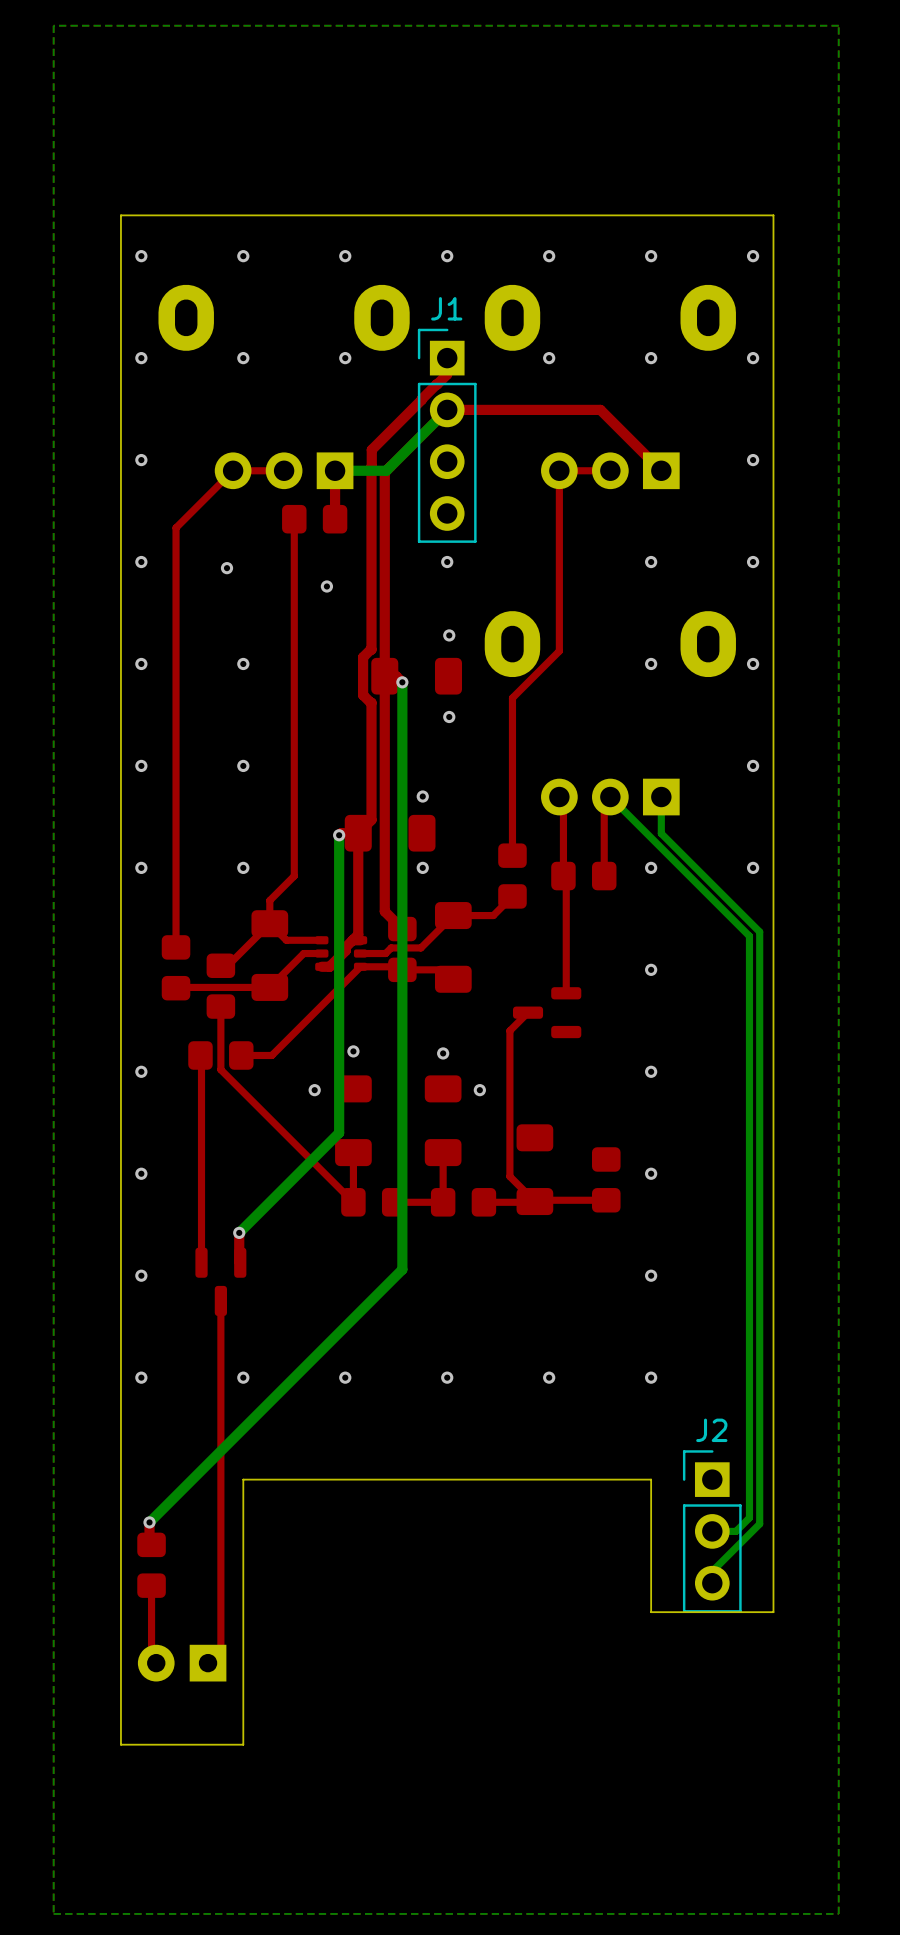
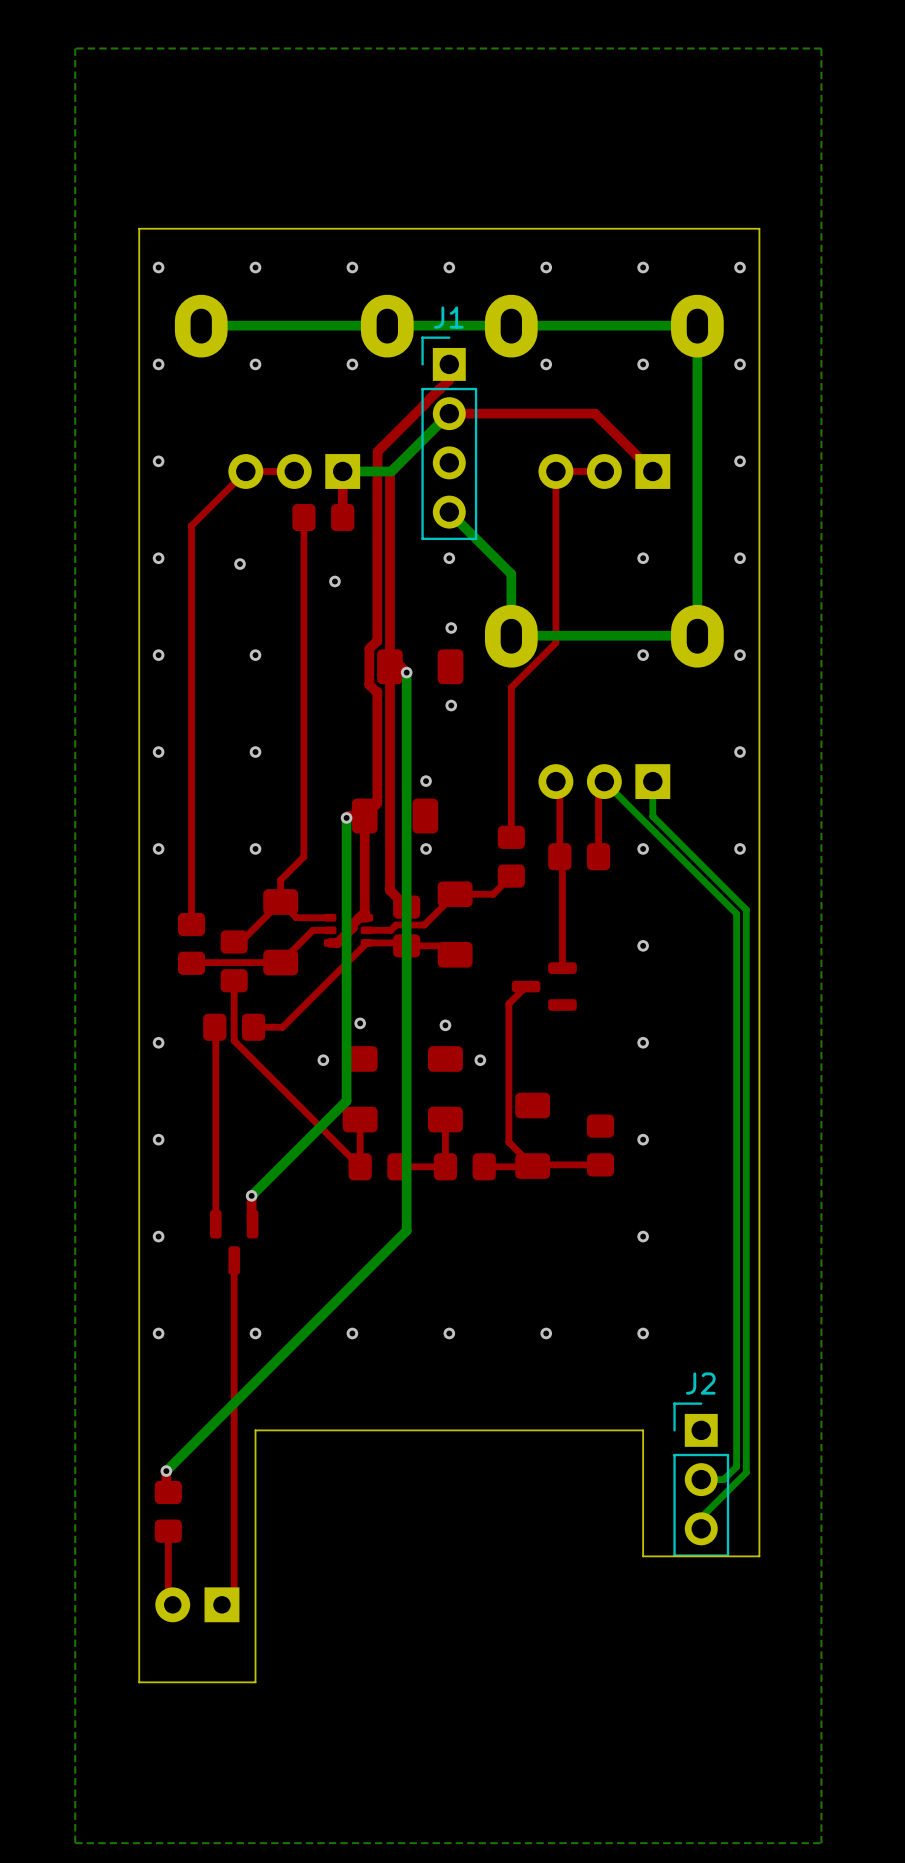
bottom track: none -> (201, 325) (697, 325) (697, 635) (511, 635) (511, 574) (449, 512)

